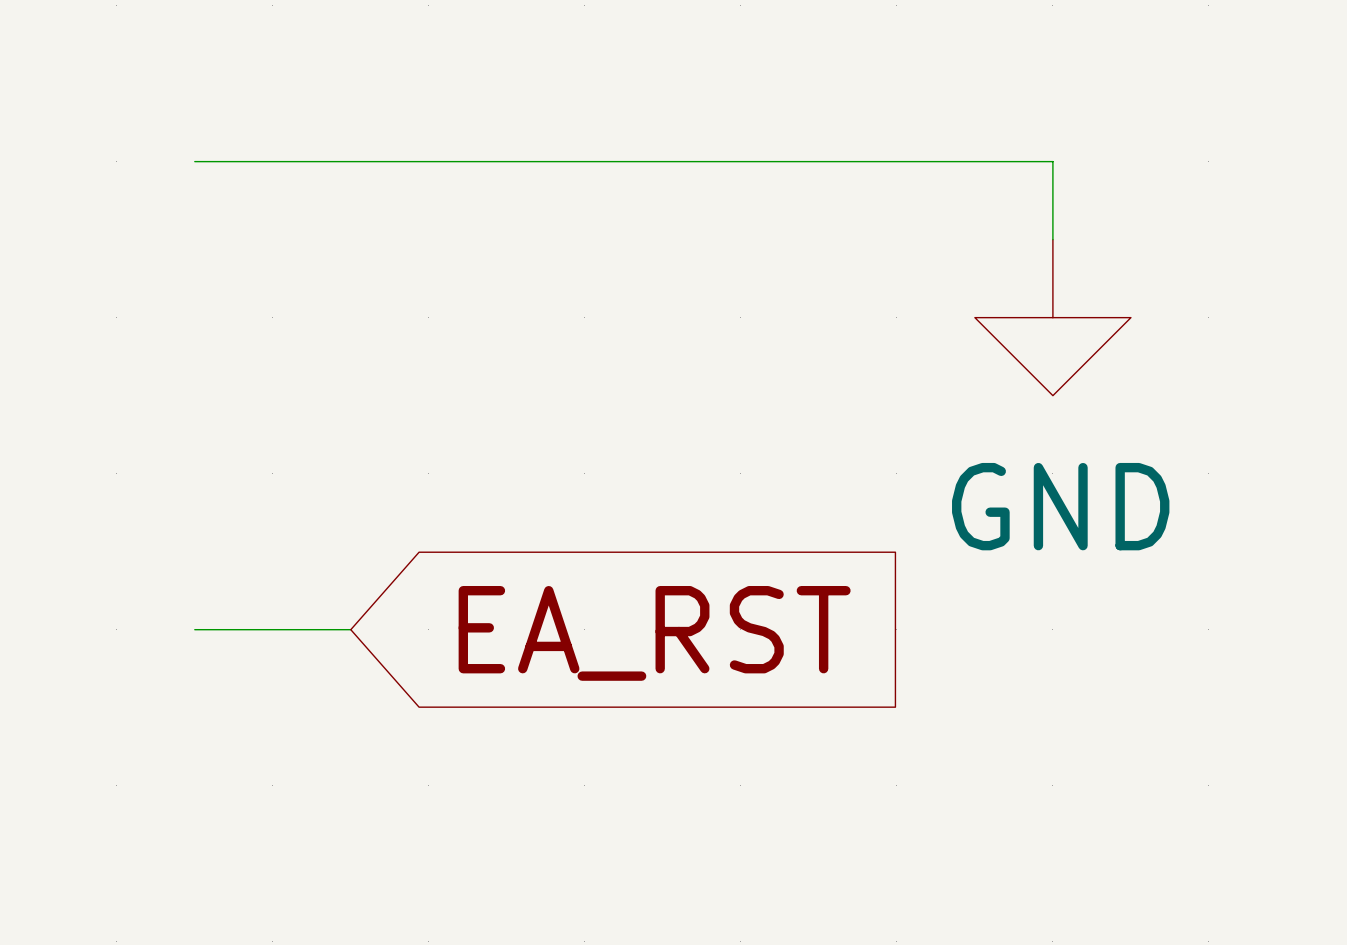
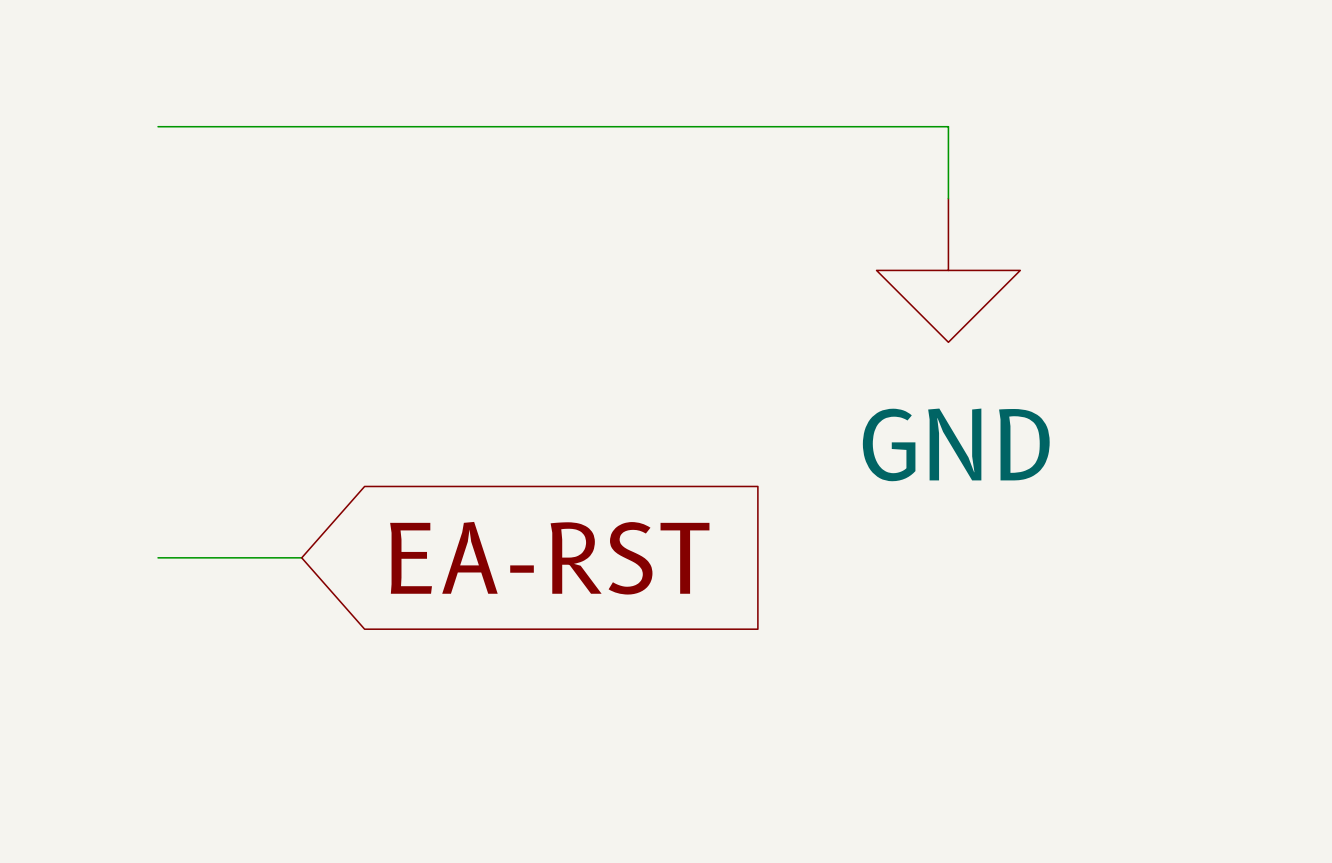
global label: EA_RST (654, 633) -> EA-RST (549, 558)

